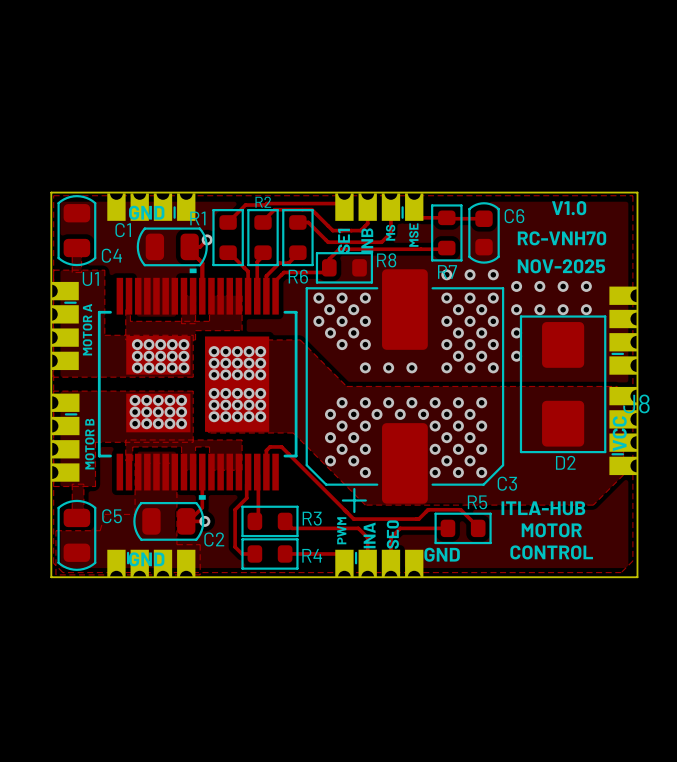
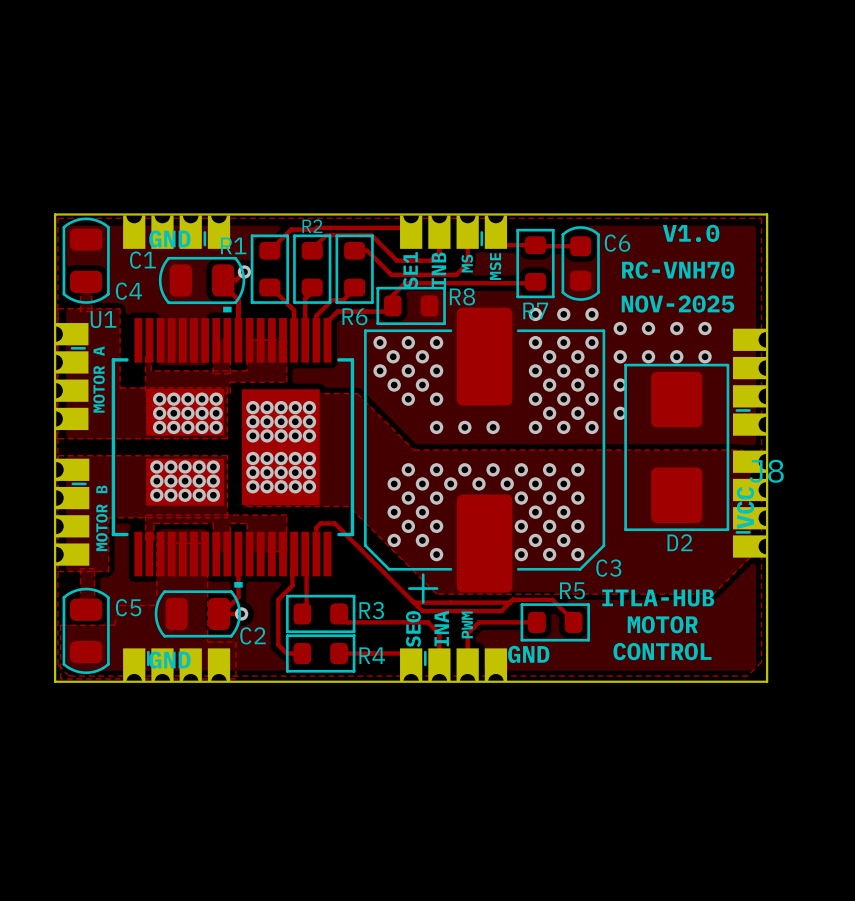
track: none -> (413, 602) (510, 602)
text position: PWM (341, 530) -> PWM (467, 624)
text position: SE0 (392, 534) -> SE0 (413, 629)

